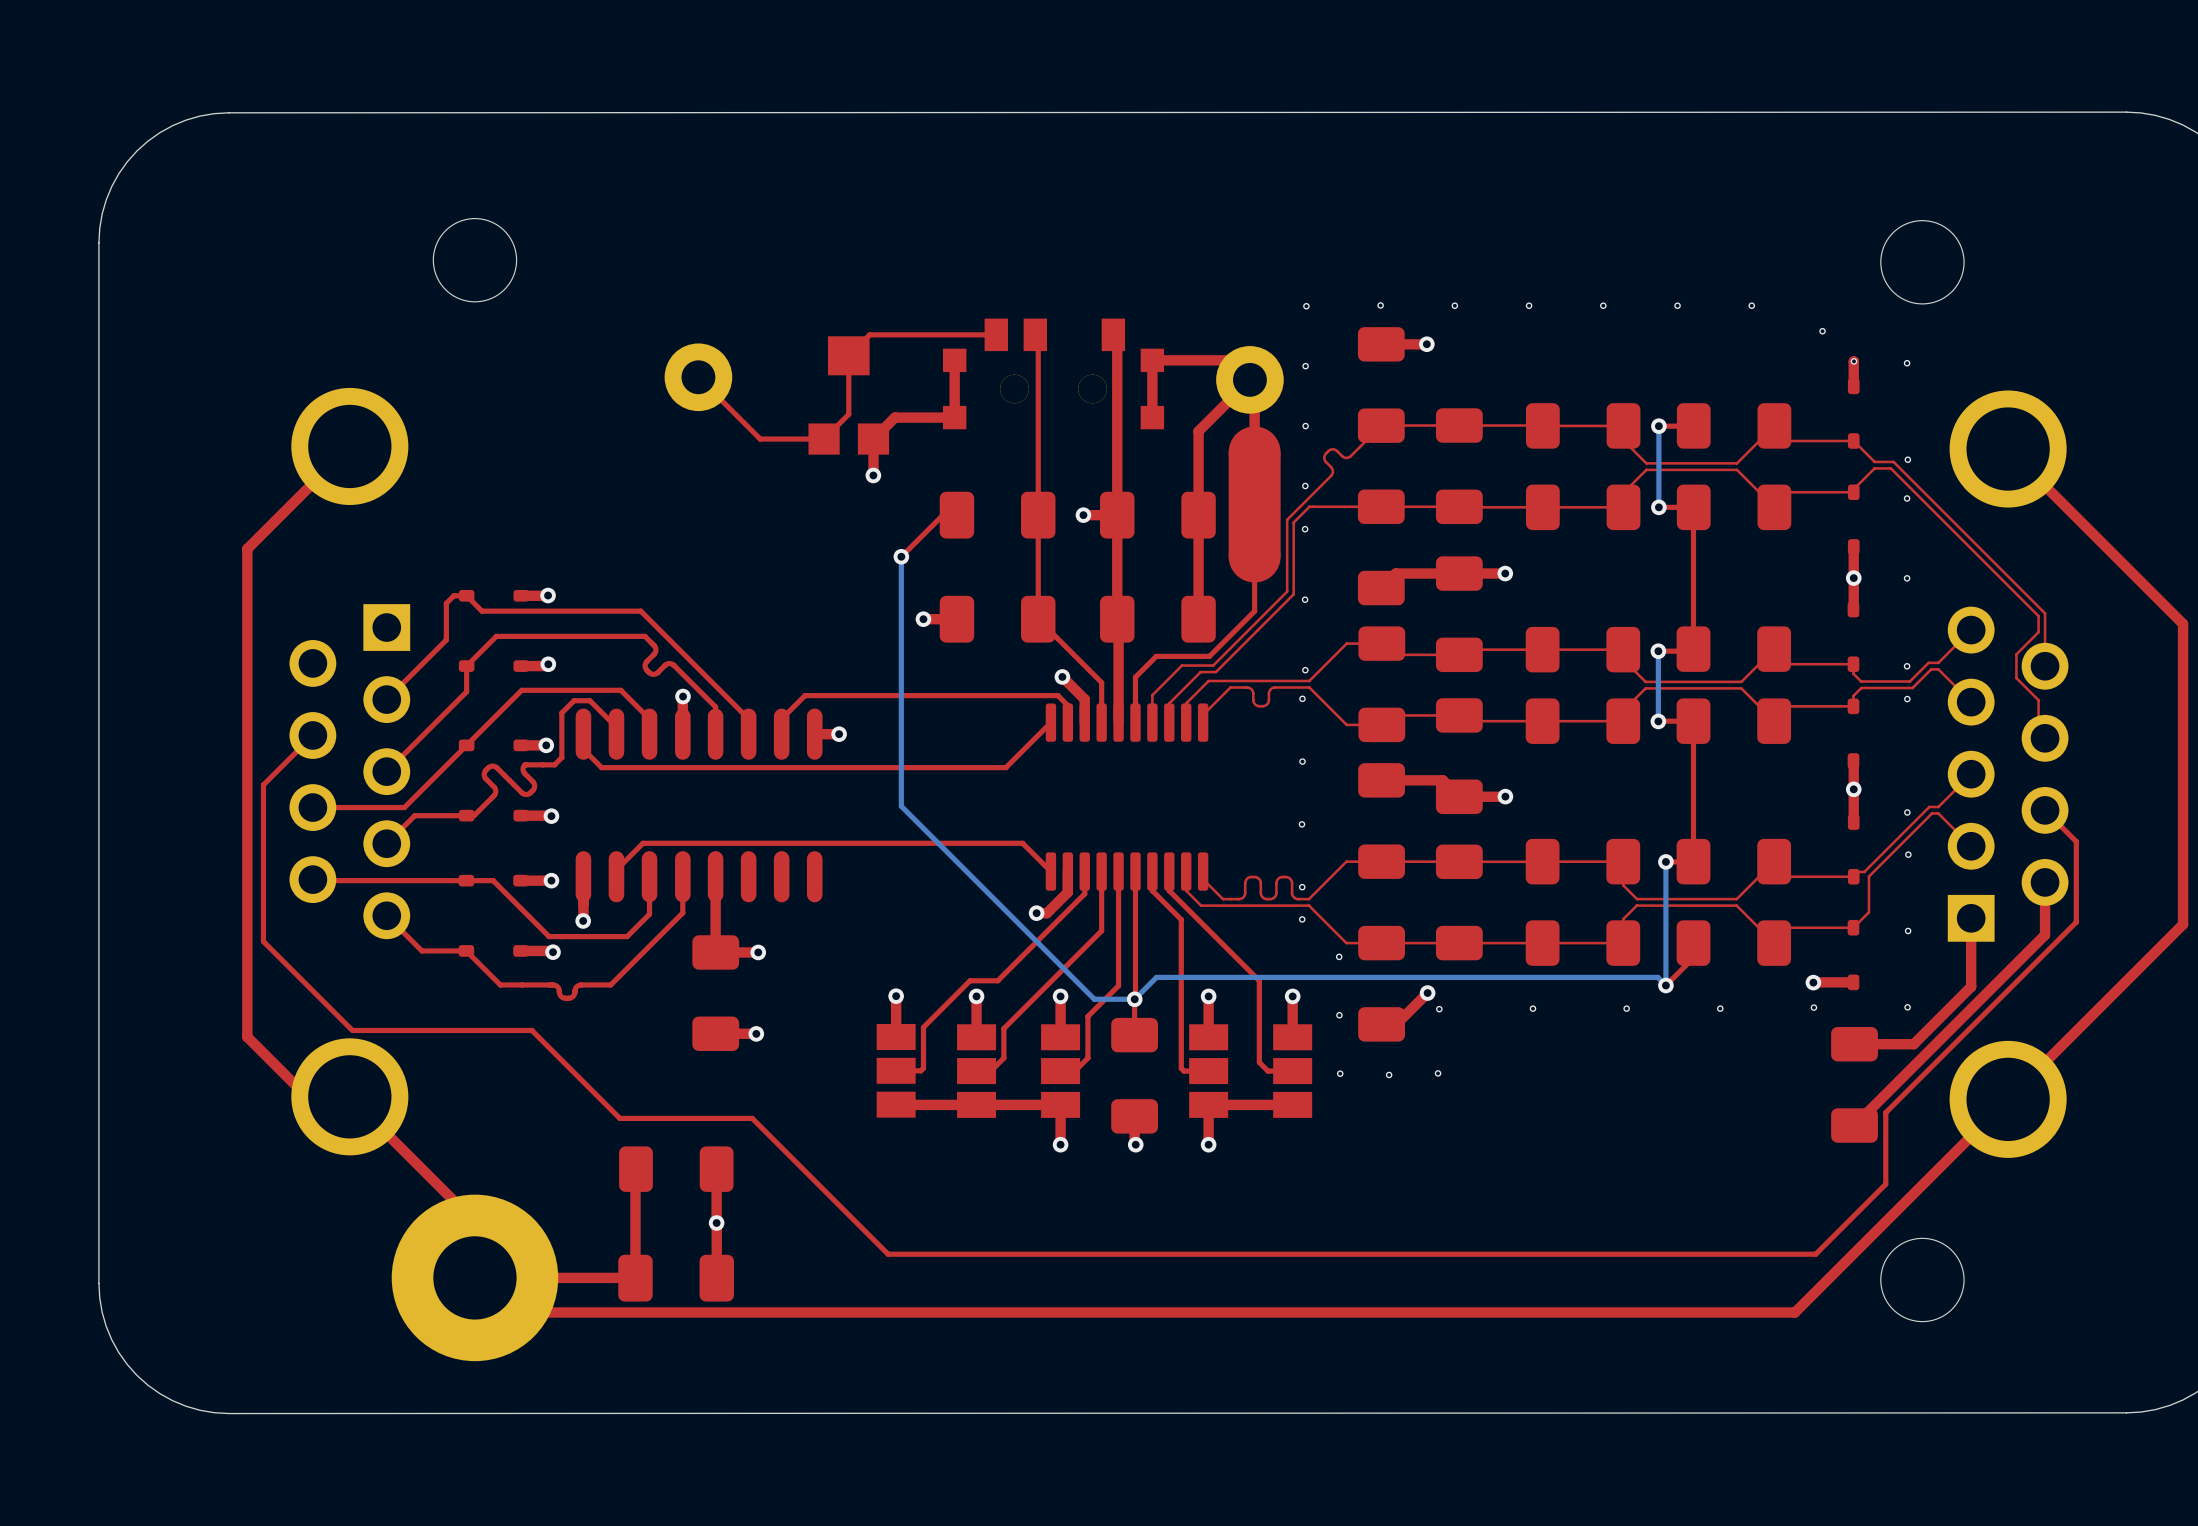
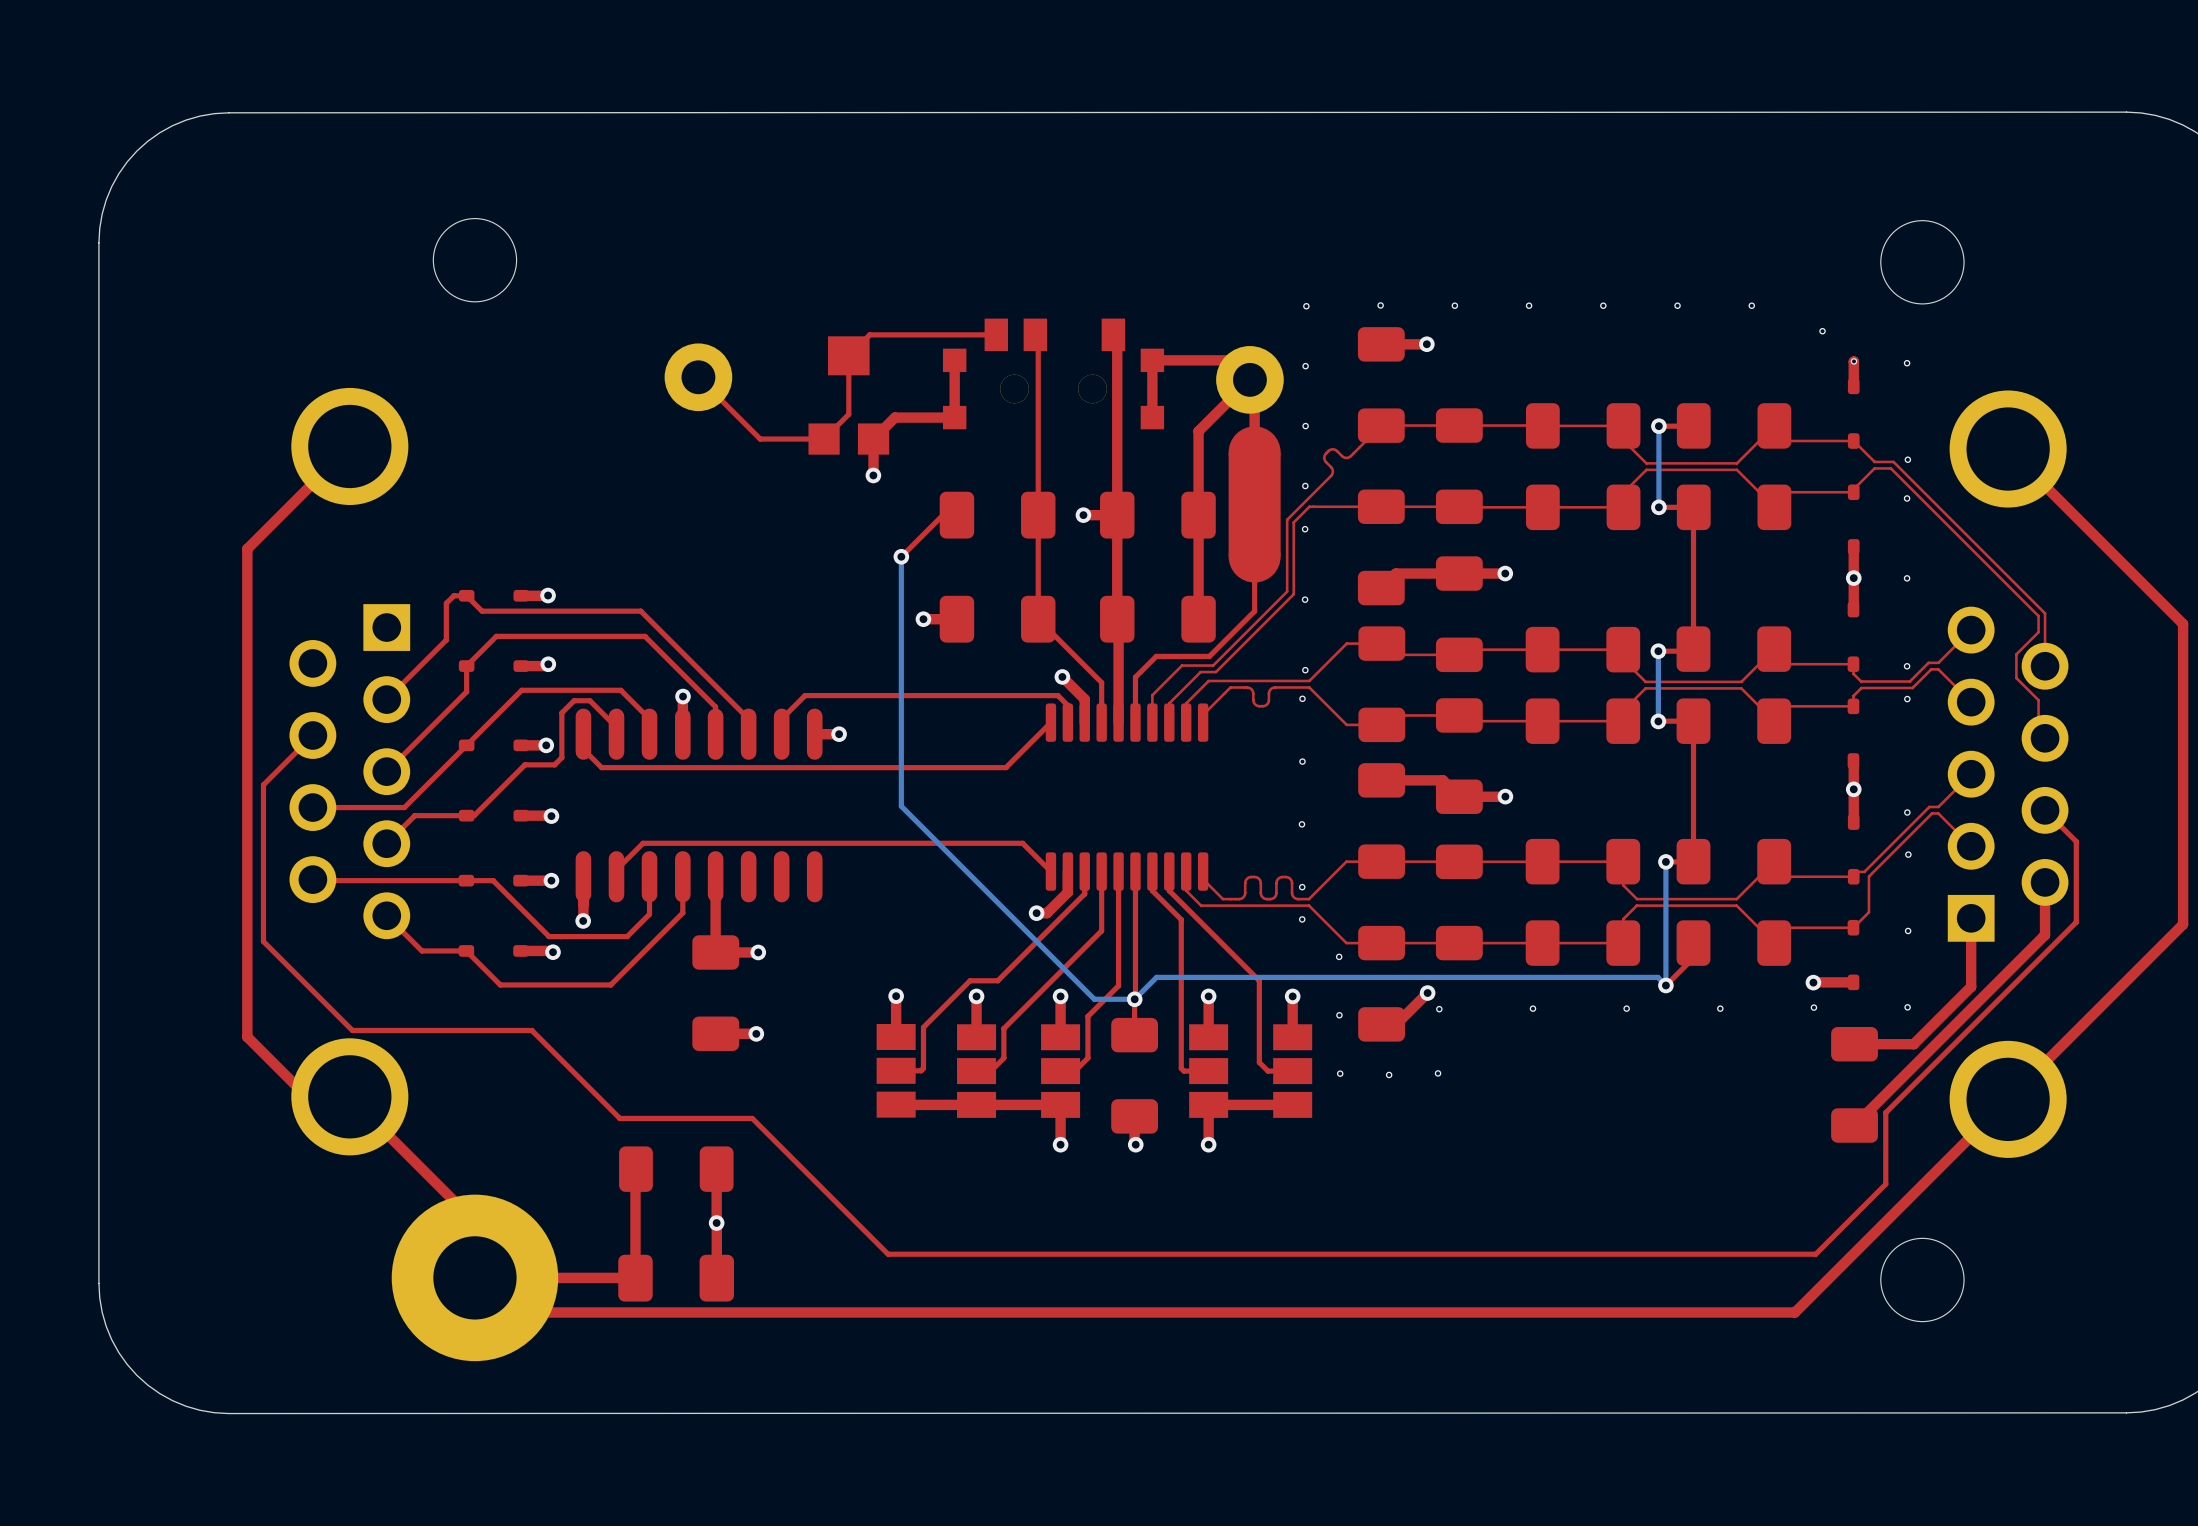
top track: (654, 645) (655, 652) (645, 664) (649, 672) (655, 673) (667, 663) (673, 665) -> (654, 645) (673, 665)
top track: (524, 764) (523, 771) (534, 785) (533, 789) (526, 794) (522, 793) (495, 766) (491, 766) (486, 770) (484, 777) (495, 789) (493, 795) -> (524, 764) (493, 795)
top track: (581, 984) (575, 987) (573, 996) (568, 998) (561, 996) (557, 987) (553, 984) -> (581, 984) (553, 984)

